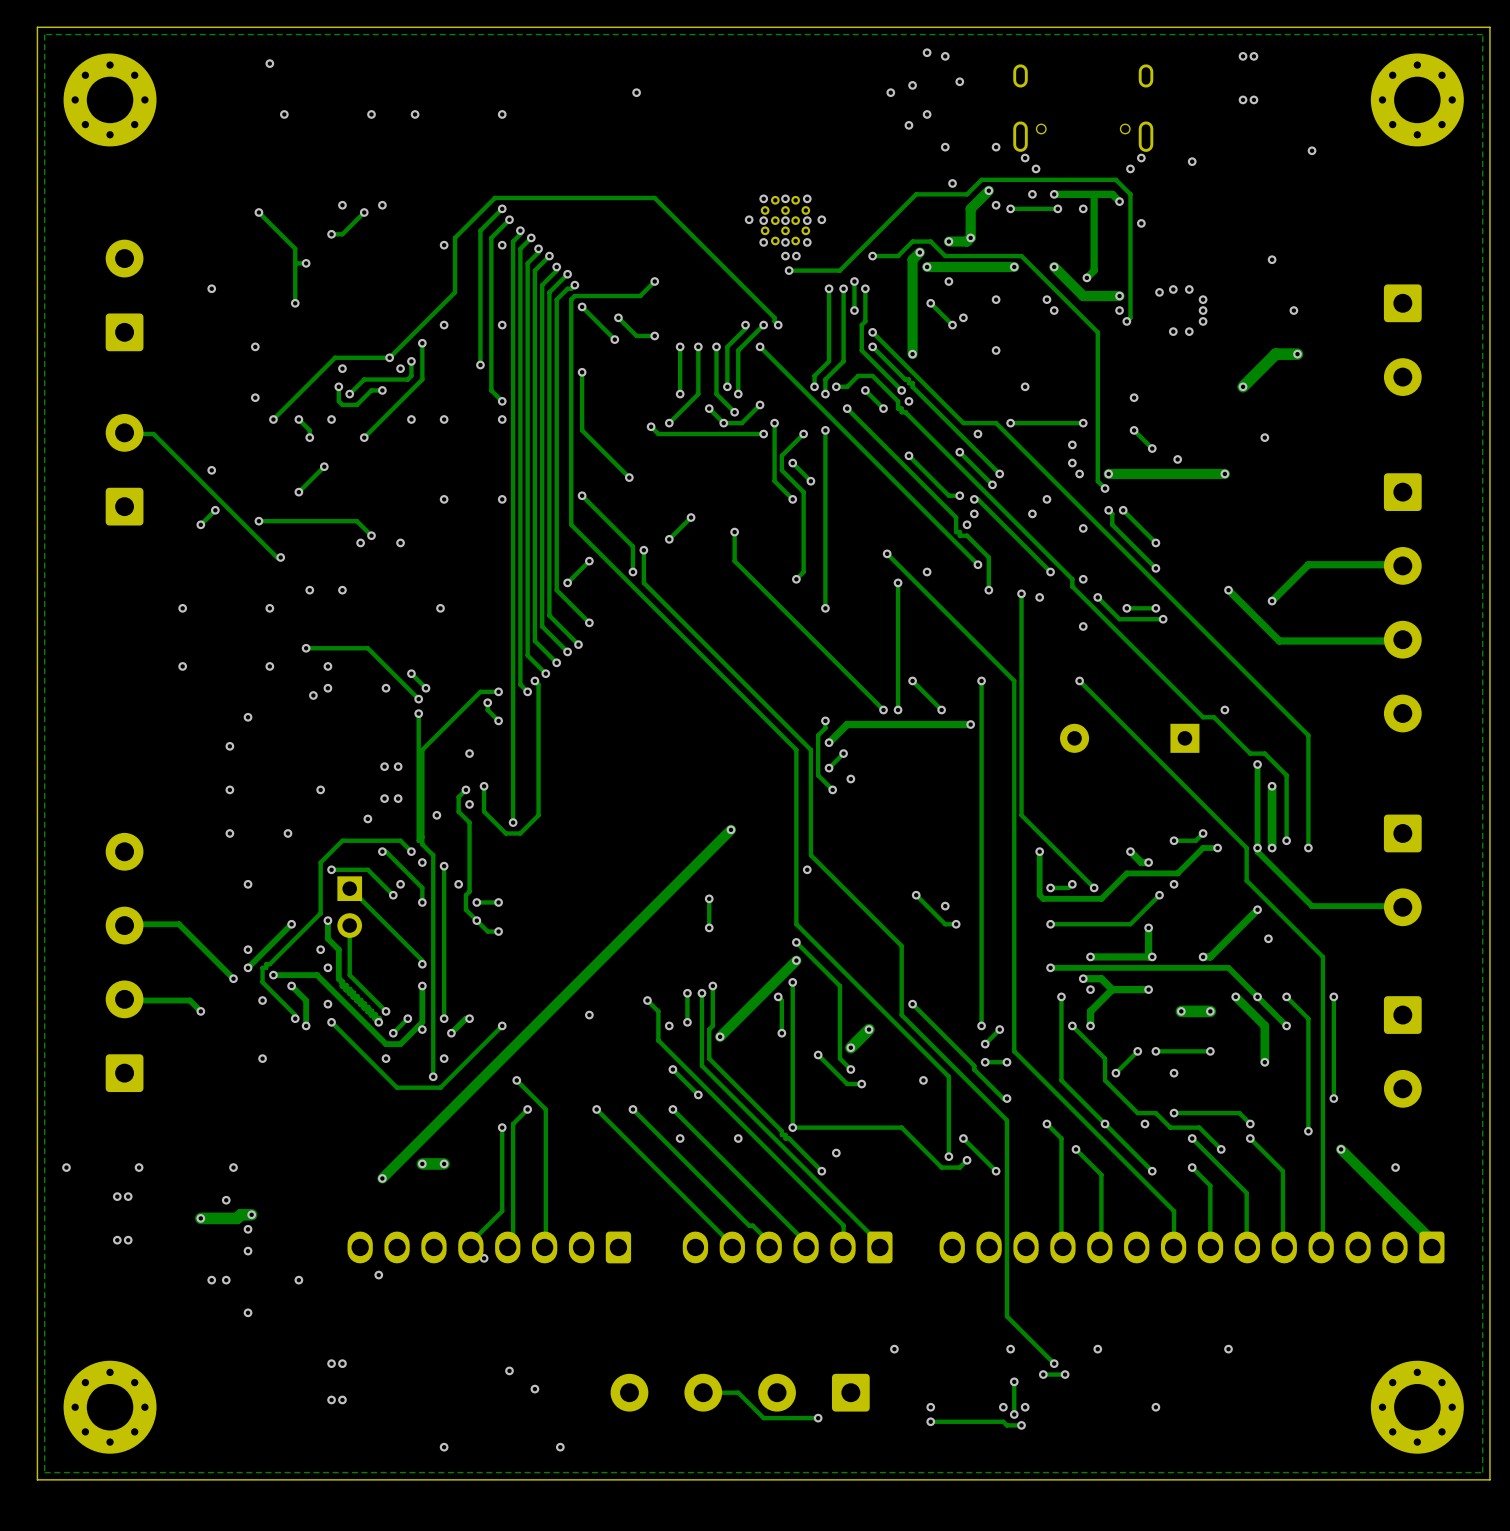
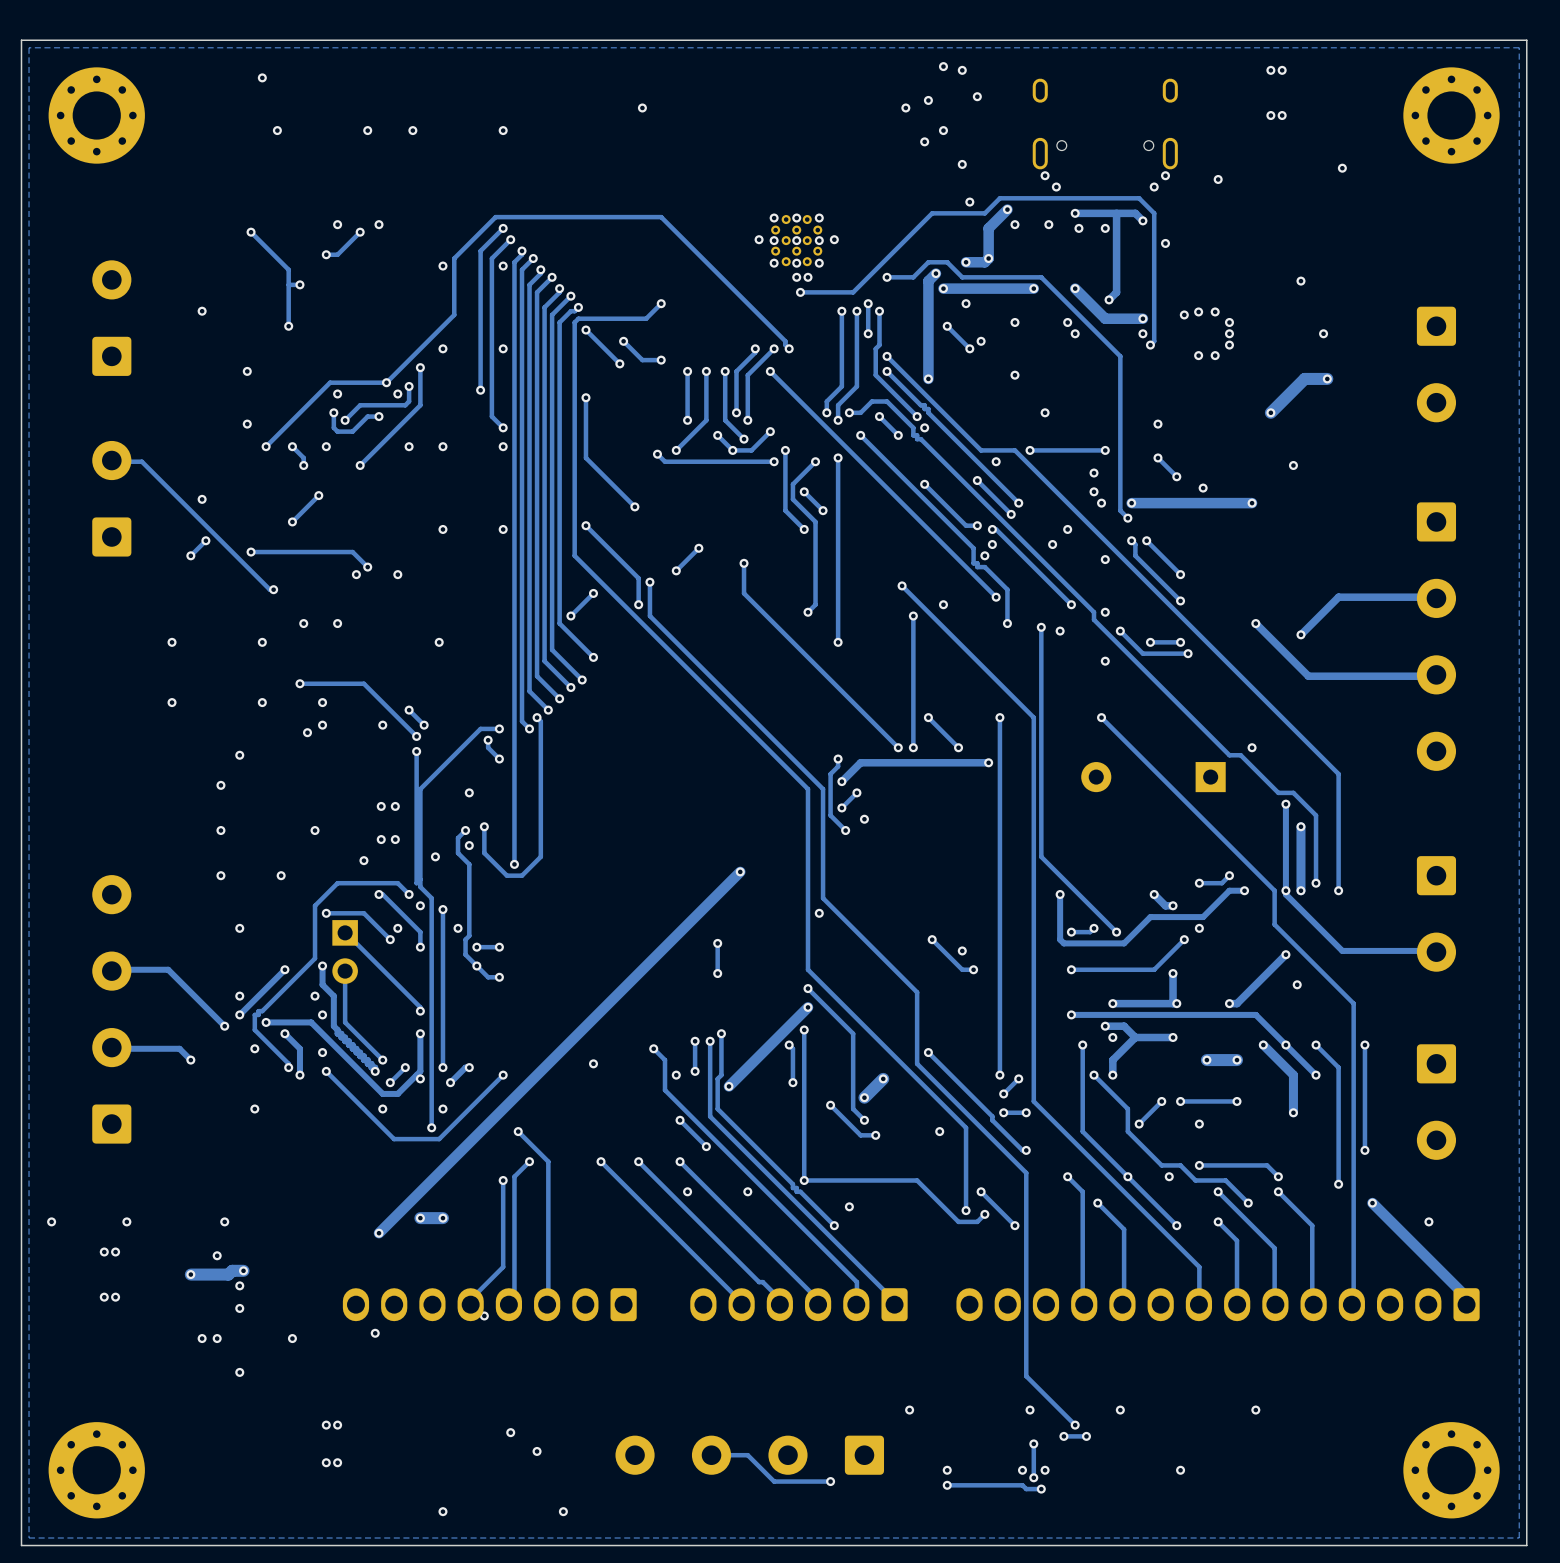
via: (996, 147) -> none
via: (1032, 194) -> none
via: none -> (1048, 224)
via: (1010, 208) -> none
track: (1057, 208) (1010, 208) -> none

